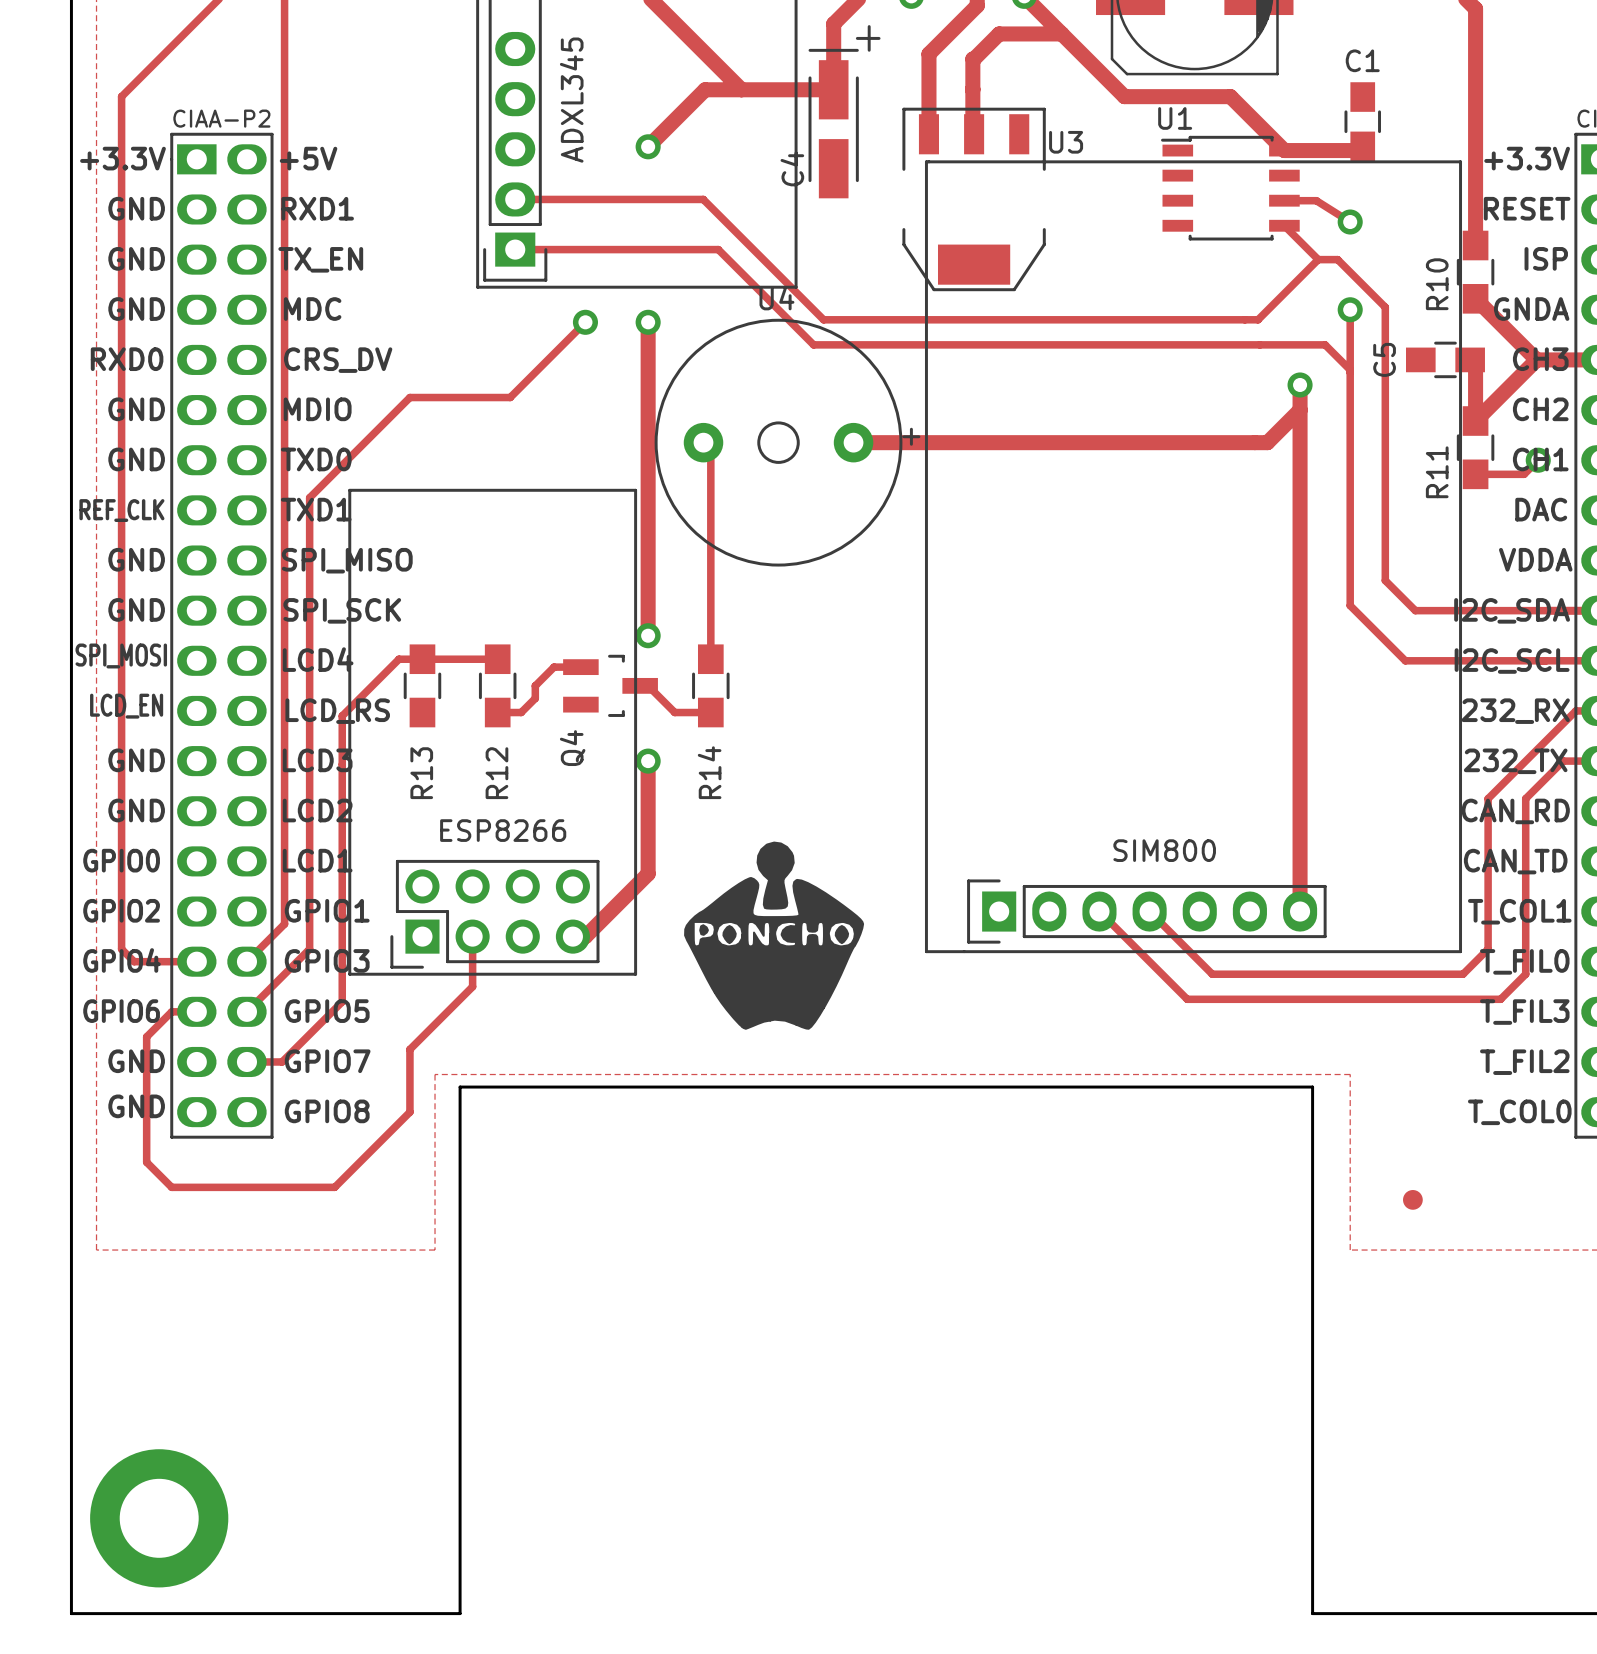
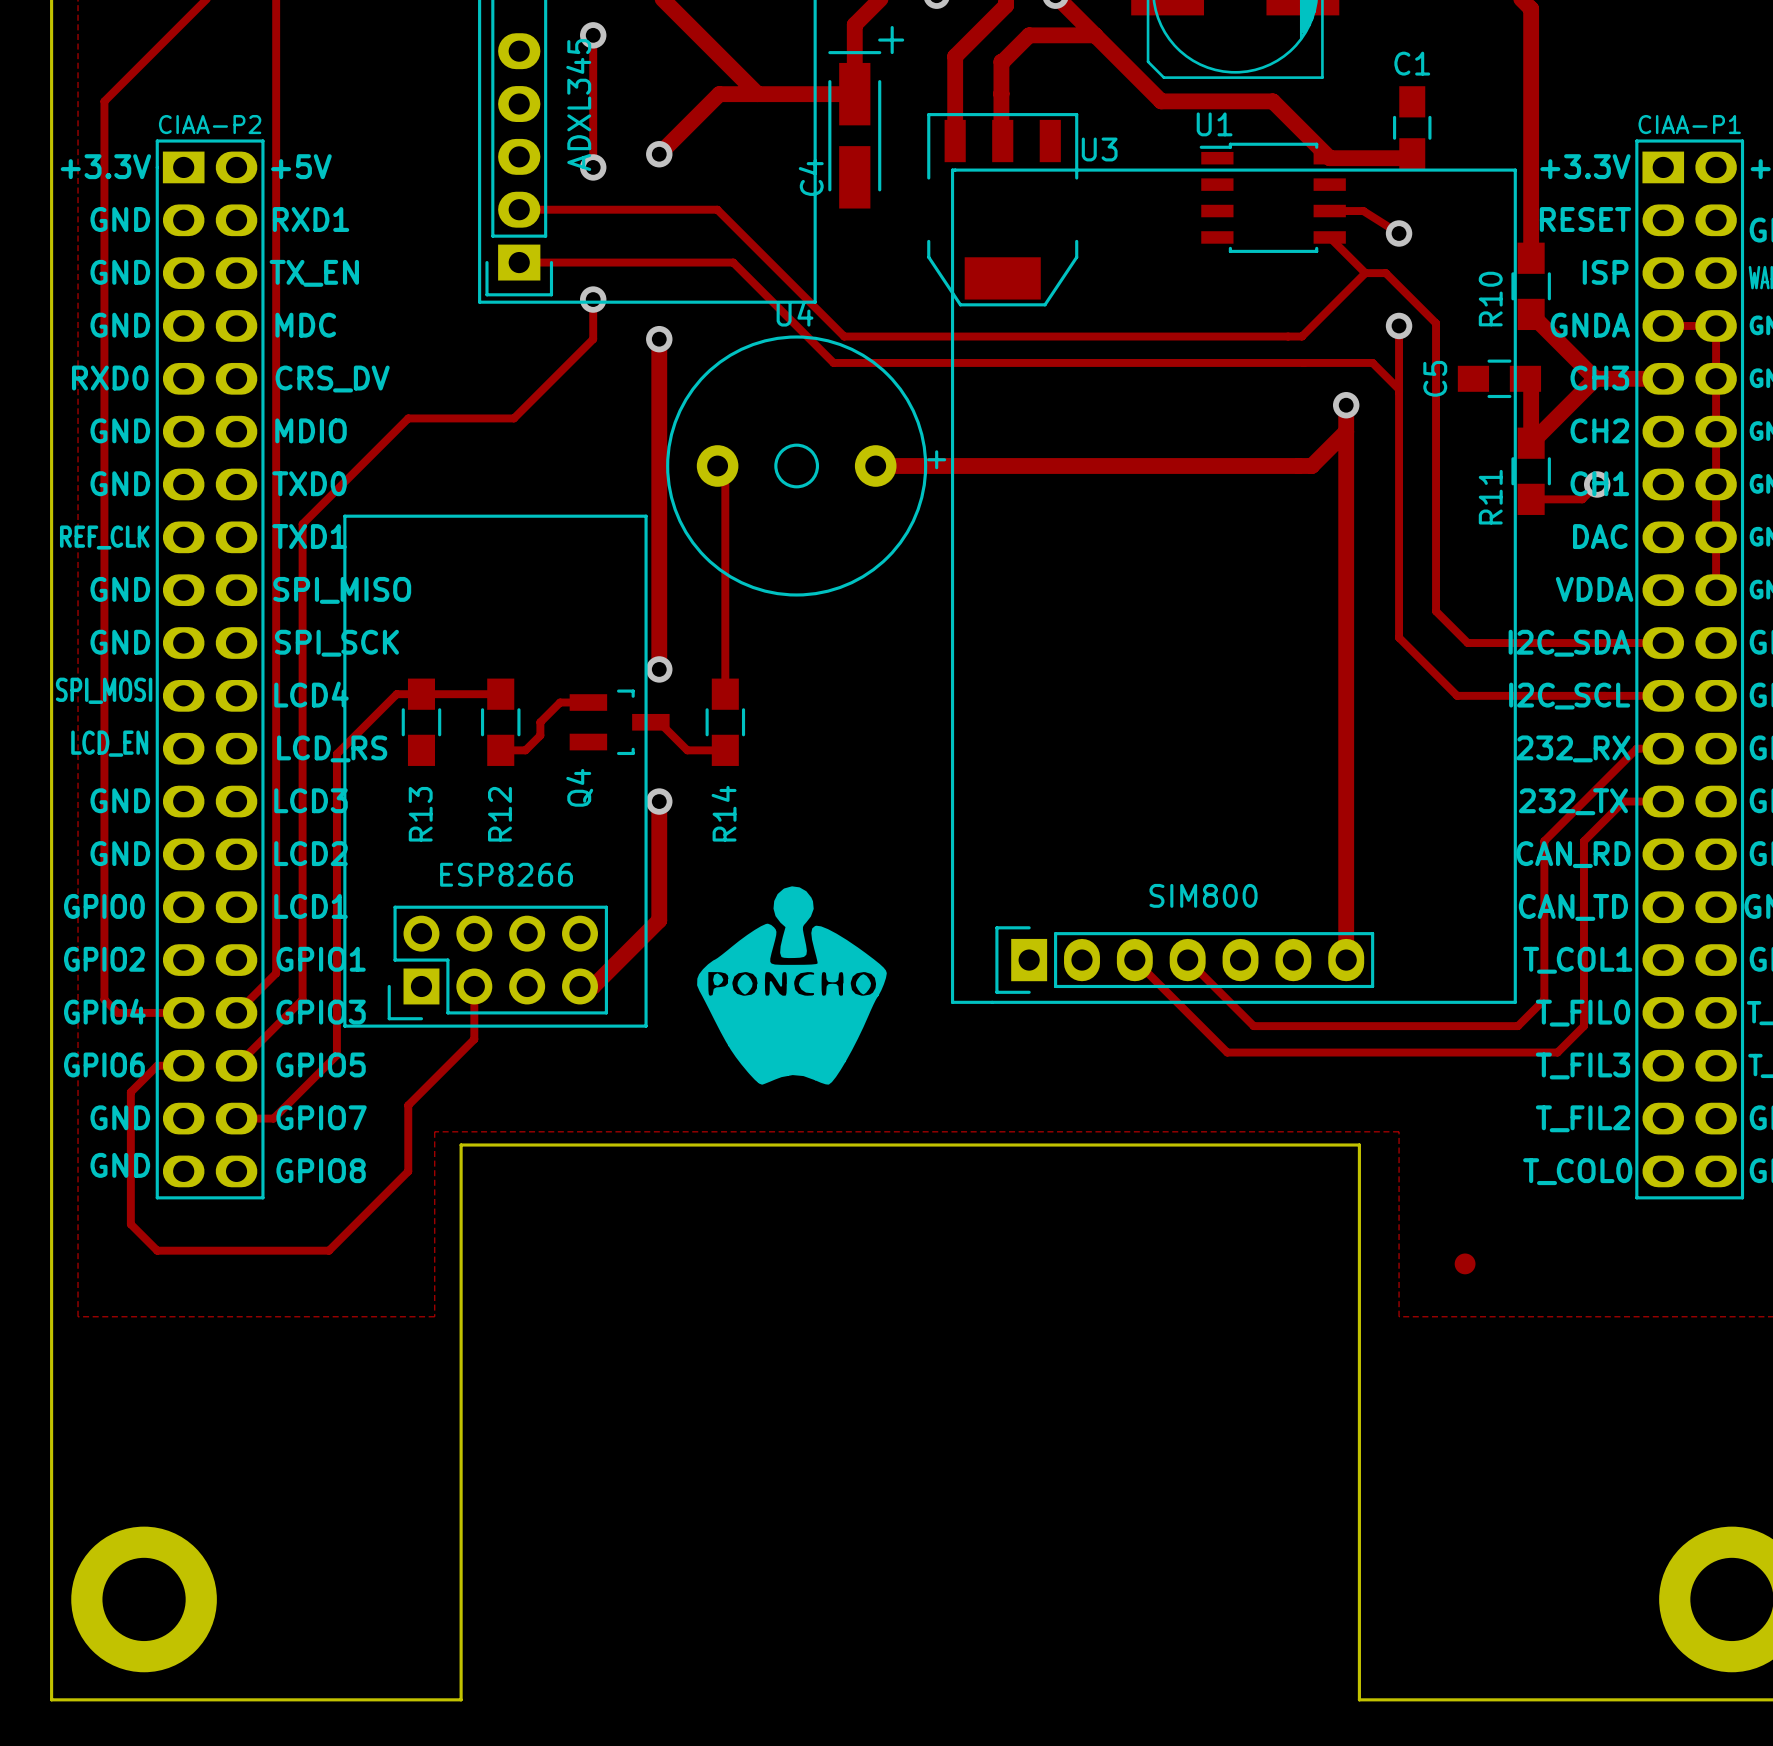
track: none -> (593, 35) (593, 167)
via: none -> (593, 35)
via: none -> (593, 167)
track: none -> (593, 299) (593, 339)
via position: (585, 322) -> (593, 299)

